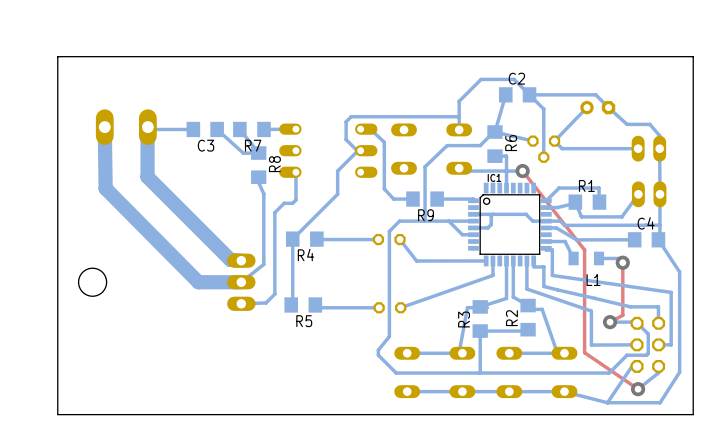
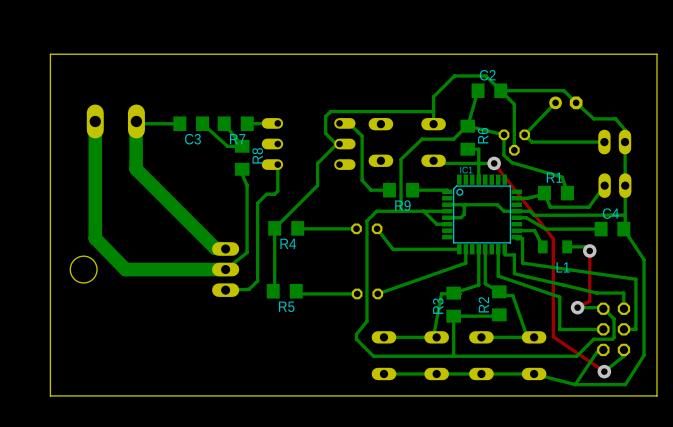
bottom track: (104, 127) (105, 188) (198, 282) -> (95, 121) (95, 238) (125, 269) (184, 269)
bottom track: (546, 200) (559, 188) (599, 188) (599, 202) -> (504, 134) (503, 155) (511, 162) (562, 177) (567, 193)

